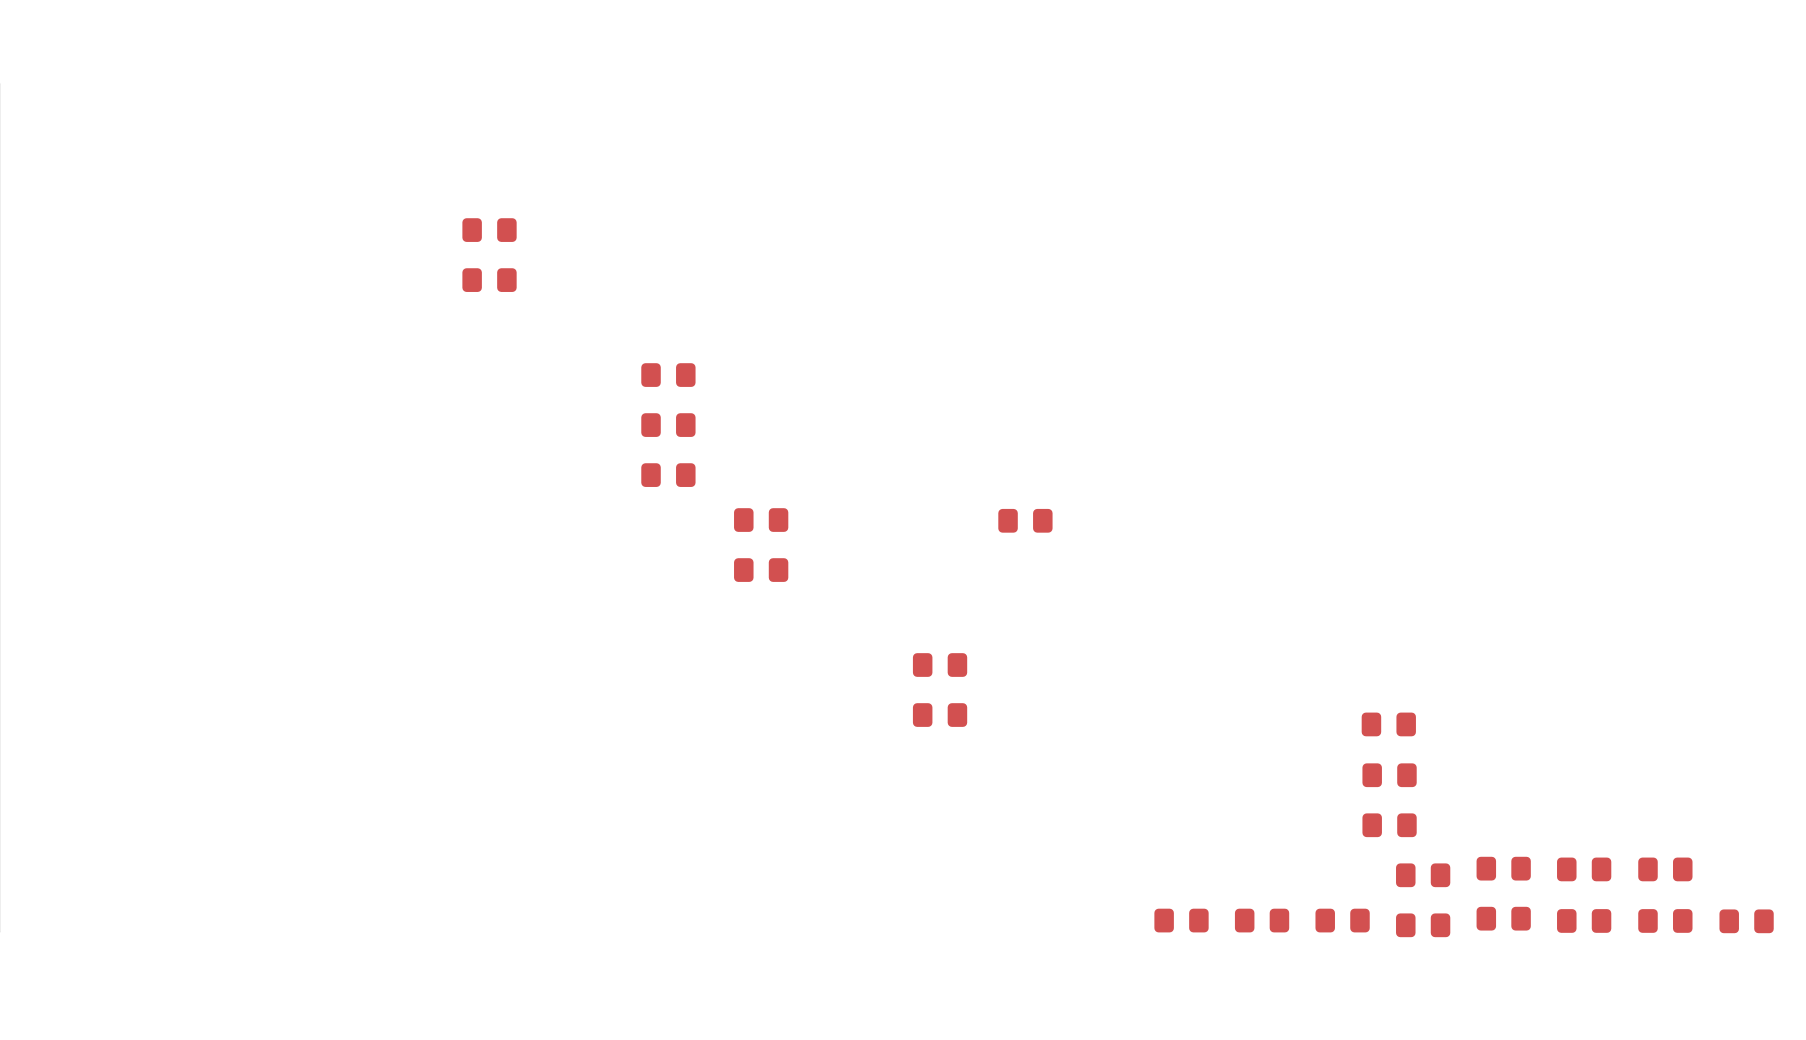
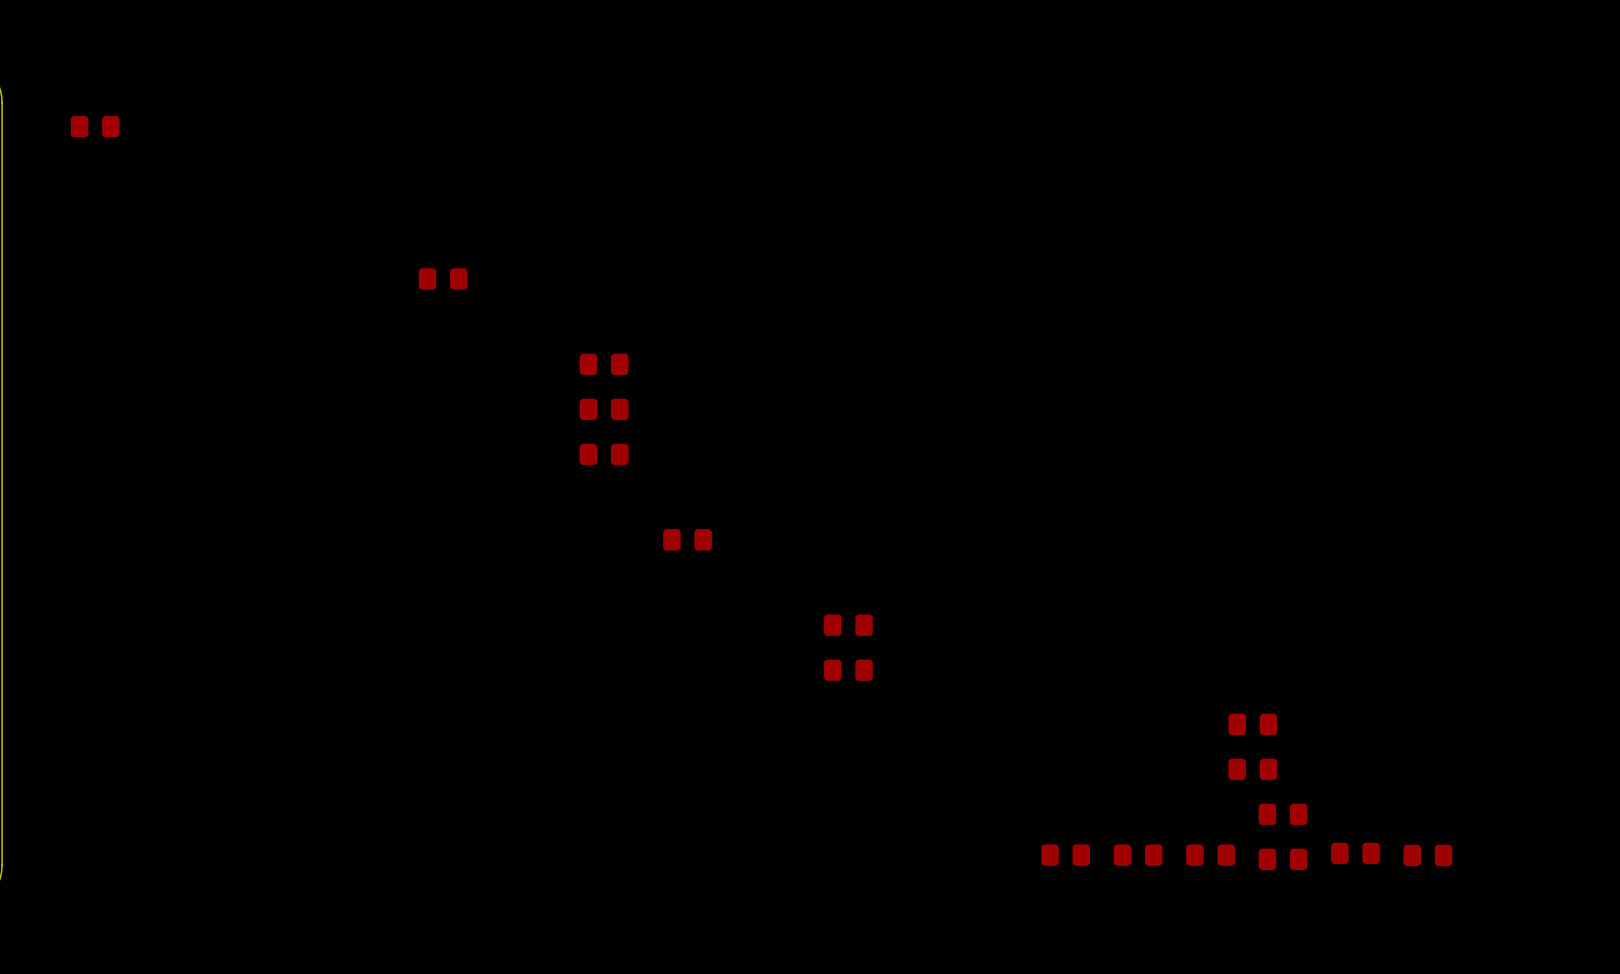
part: none -> (95, 126)
part: (489, 230) -> none
part: (761, 520) -> none
part: (1025, 520) -> none
part: (1388, 724) -> none
part: (1503, 868) -> none
part: (1584, 869) -> none
part: (1665, 869) -> none
part: (1665, 920) -> none
part: (1746, 921) -> none

